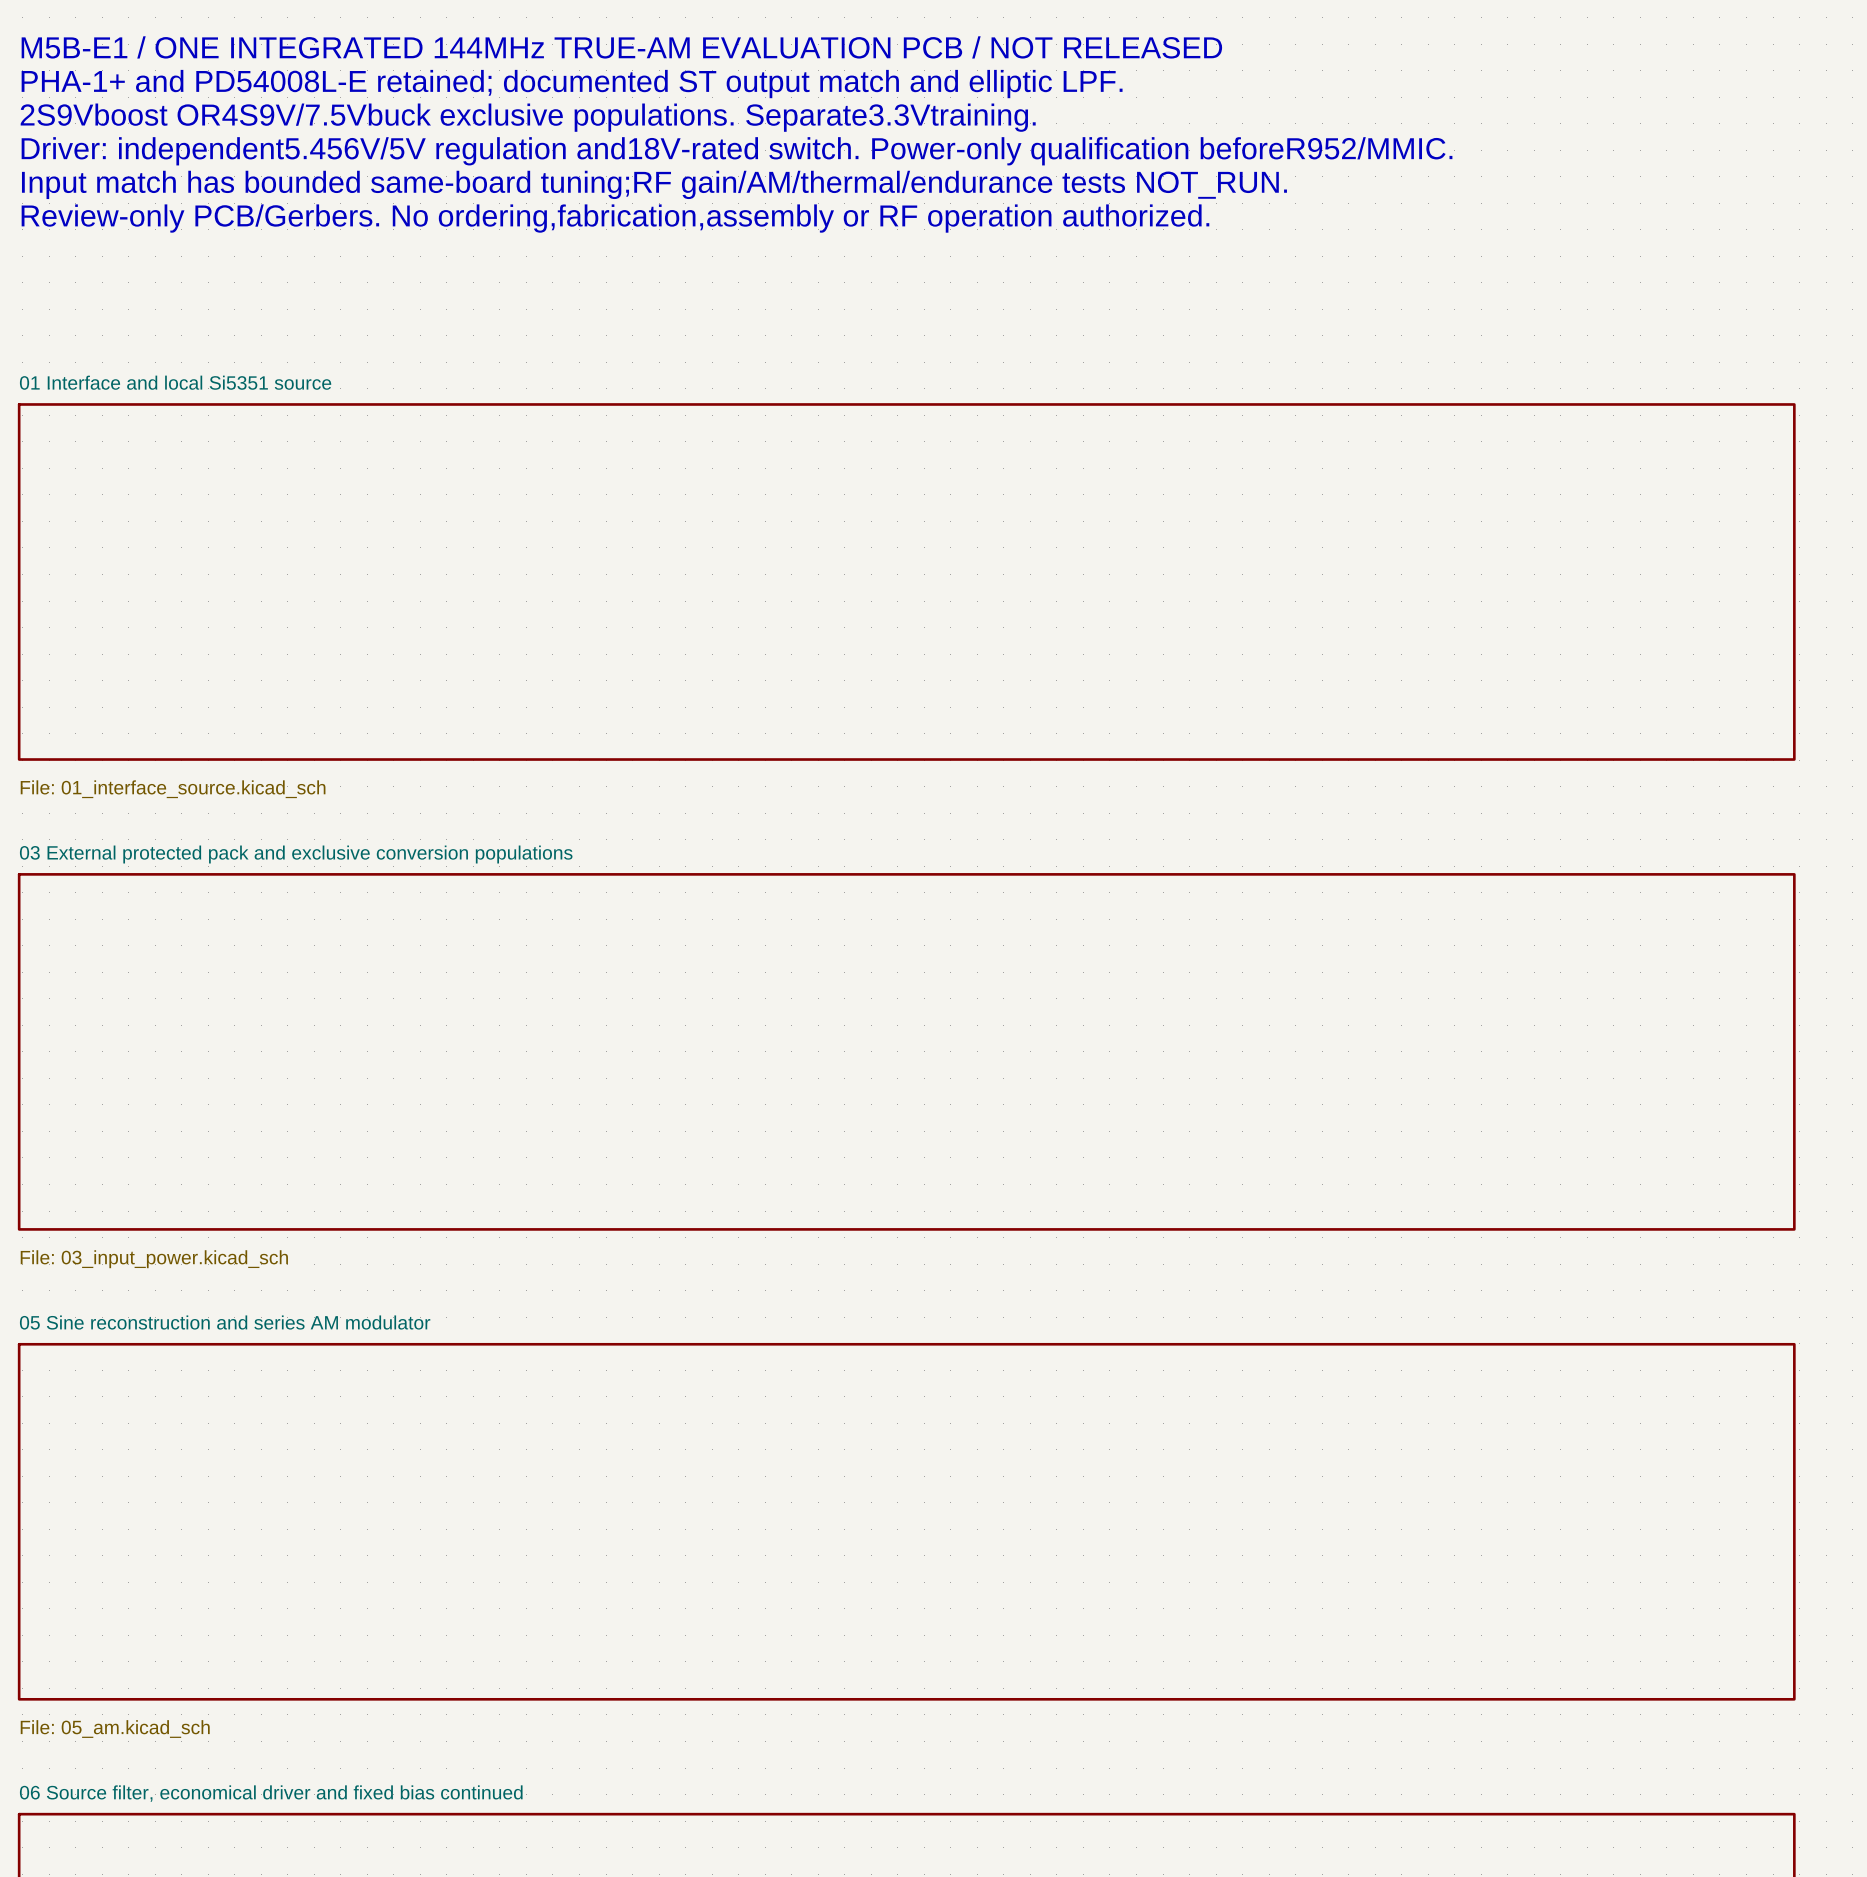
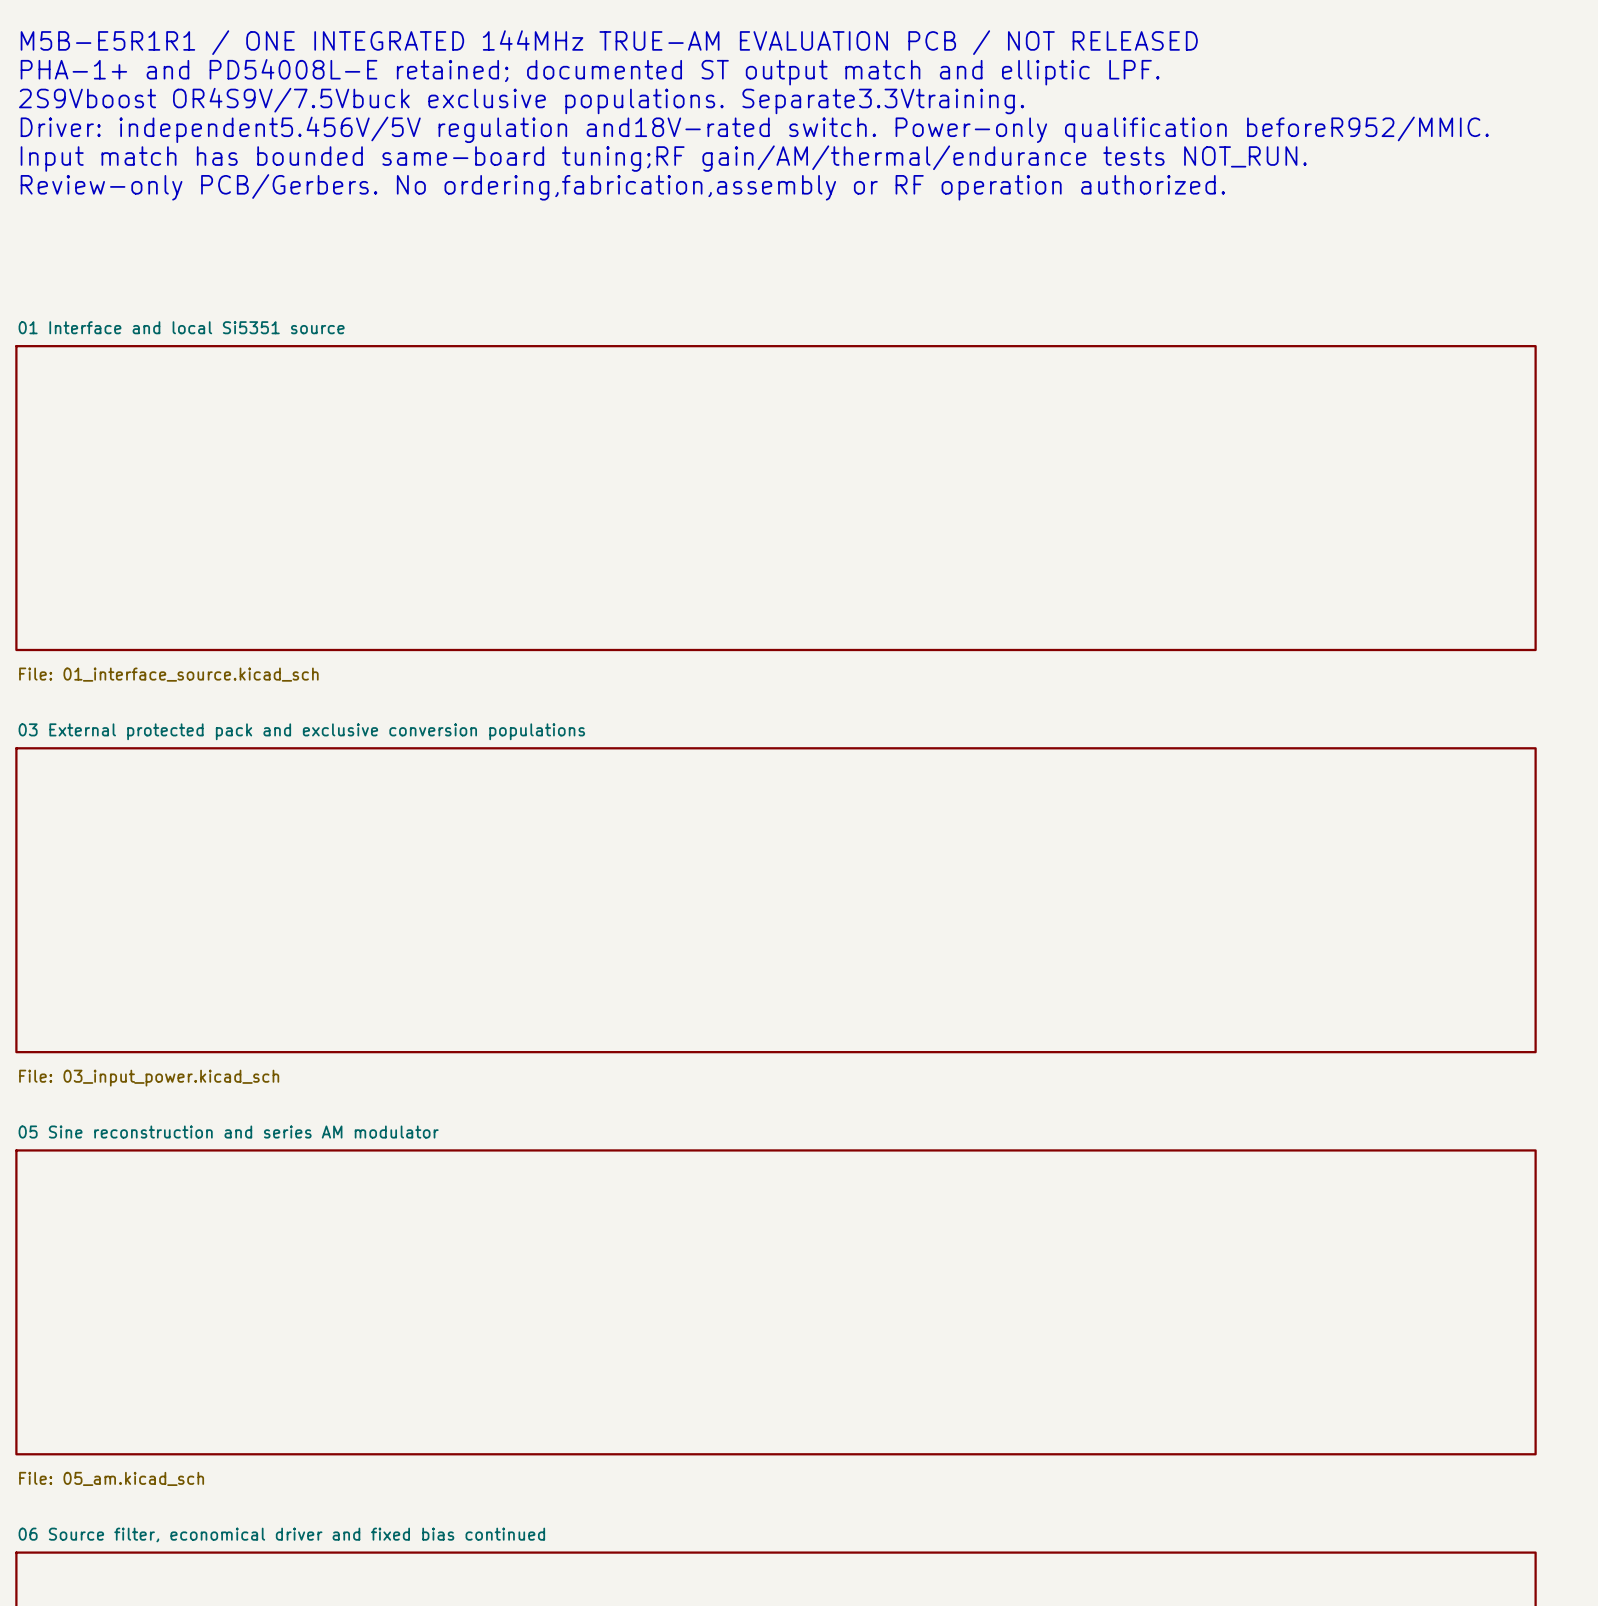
text: M5B-E1 / ONE INTEGRATED 144MHz TRUE-AM EVALUATION PCB / NOT RELEASED (621, 47) -> M5B-E5R1R1 / ONE INTEGRATED 144MHz TRUE-AM EVALUATION PCB / NOT RELEASED (609, 42)

